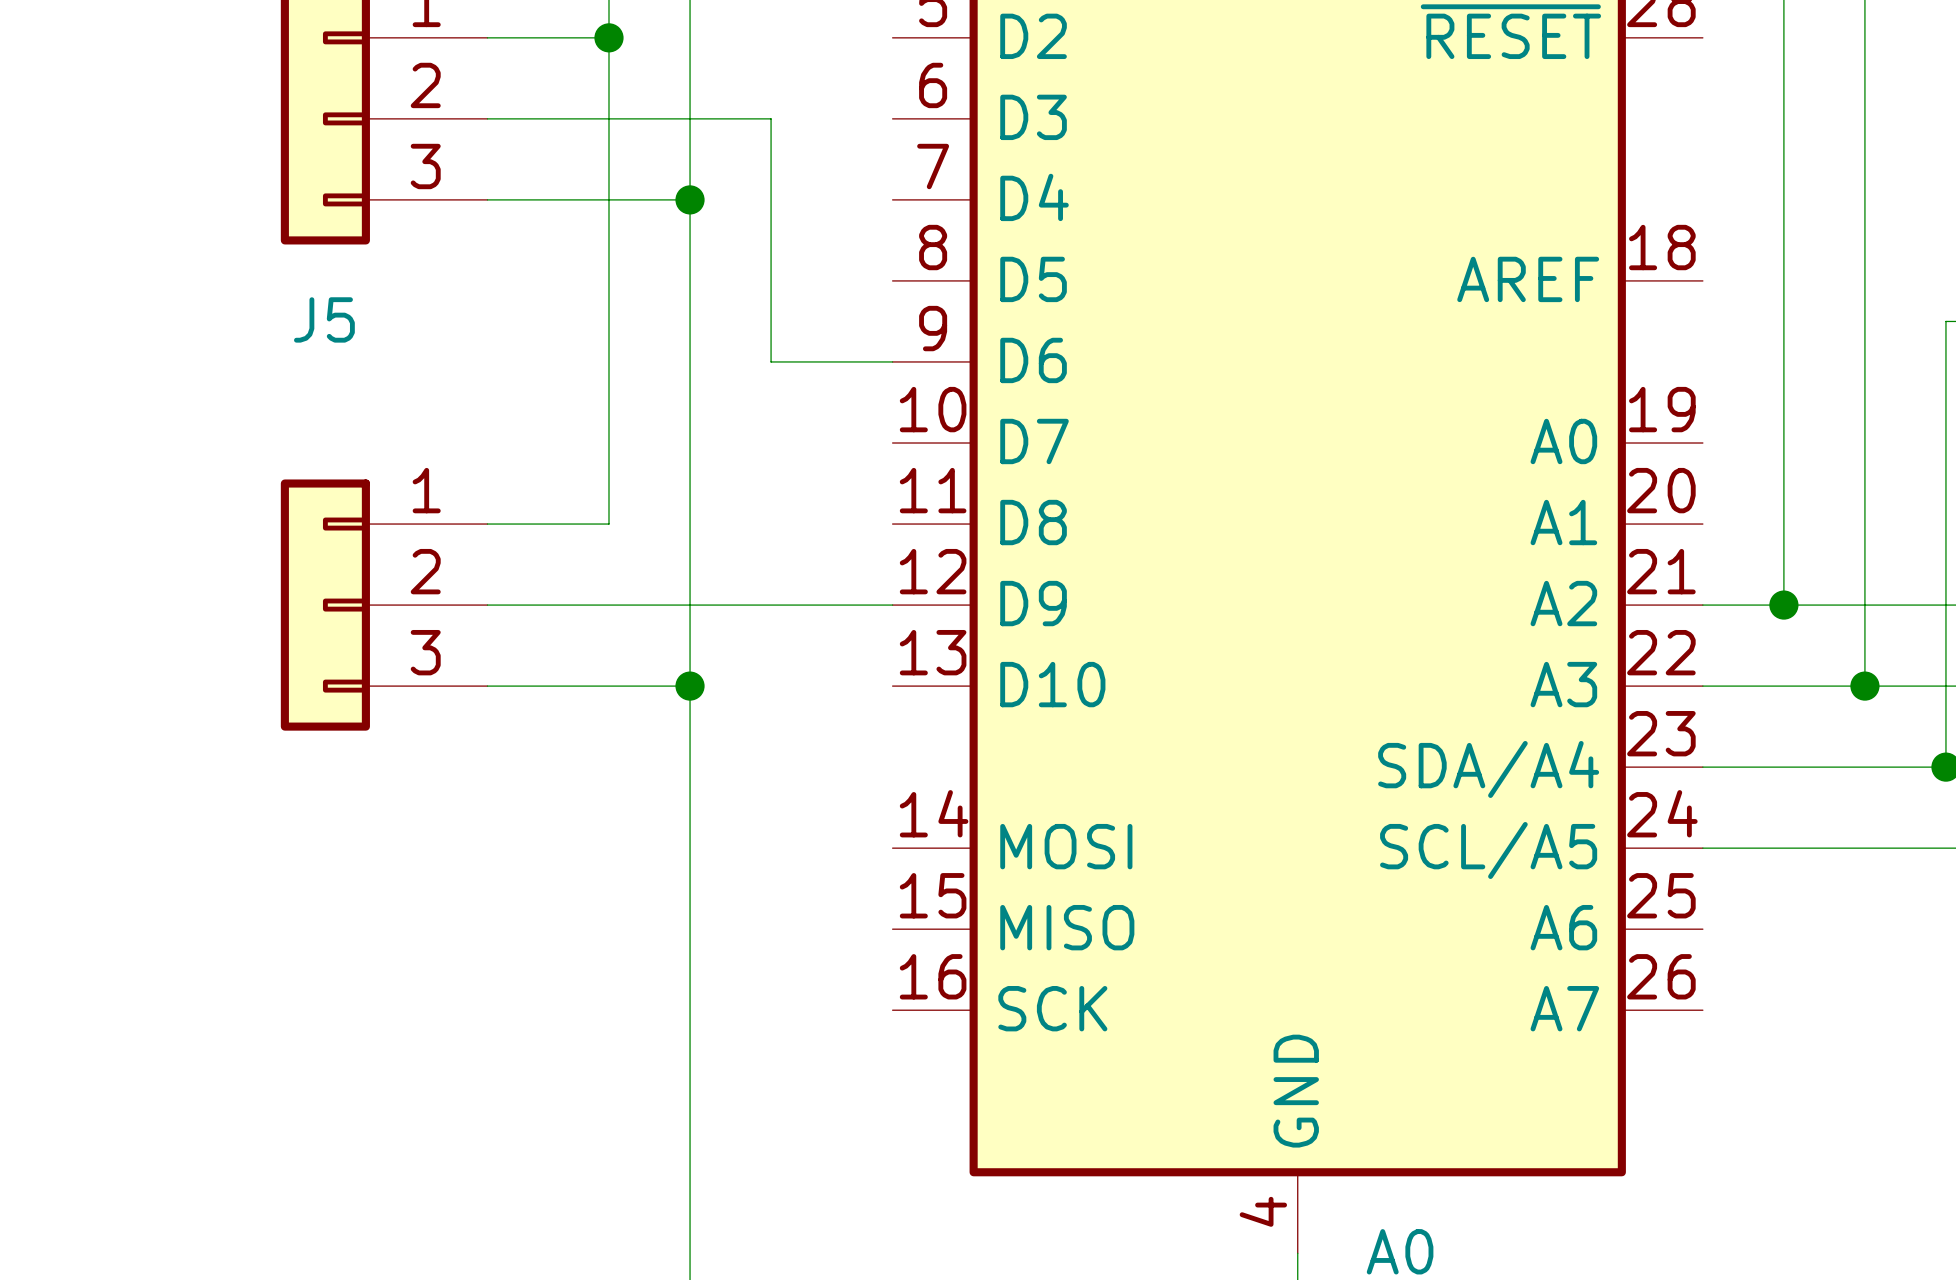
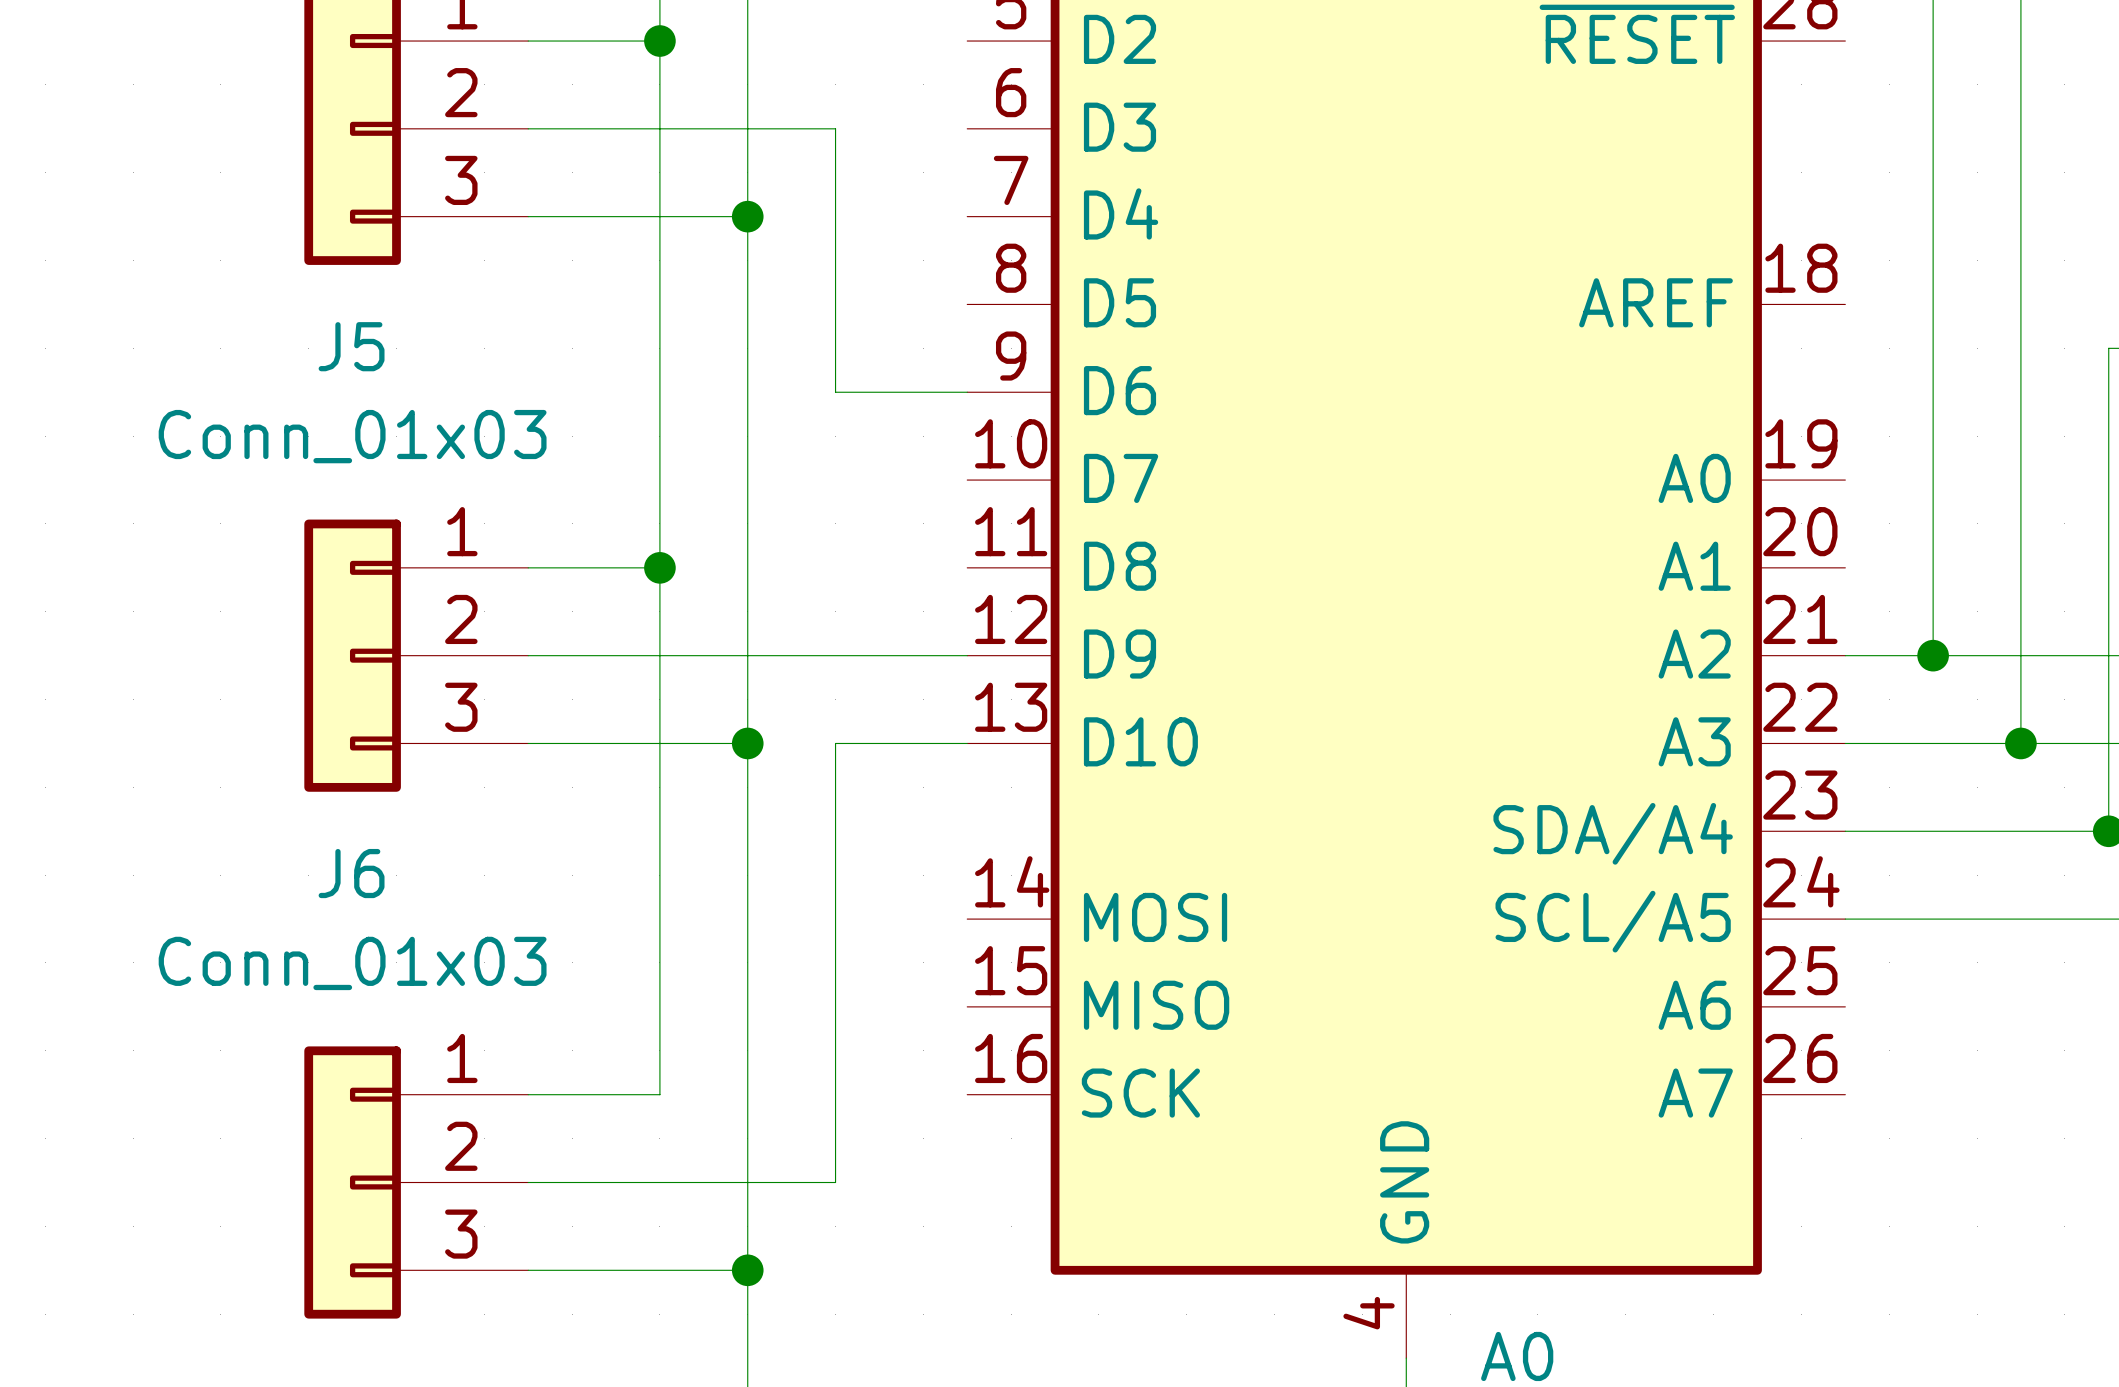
J5 value: none -> Conn_01x03 (352, 436)
wire: none -> (659, 567) (659, 1094) (528, 1094)
junction: none -> (659, 567)
wire: none -> (967, 743) (835, 743) (835, 1182) (528, 1182)
J6: none -> Conn_01x03 (416, 1182)
wire: none -> (528, 1270) (747, 1270)
junction: none -> (747, 1270)

